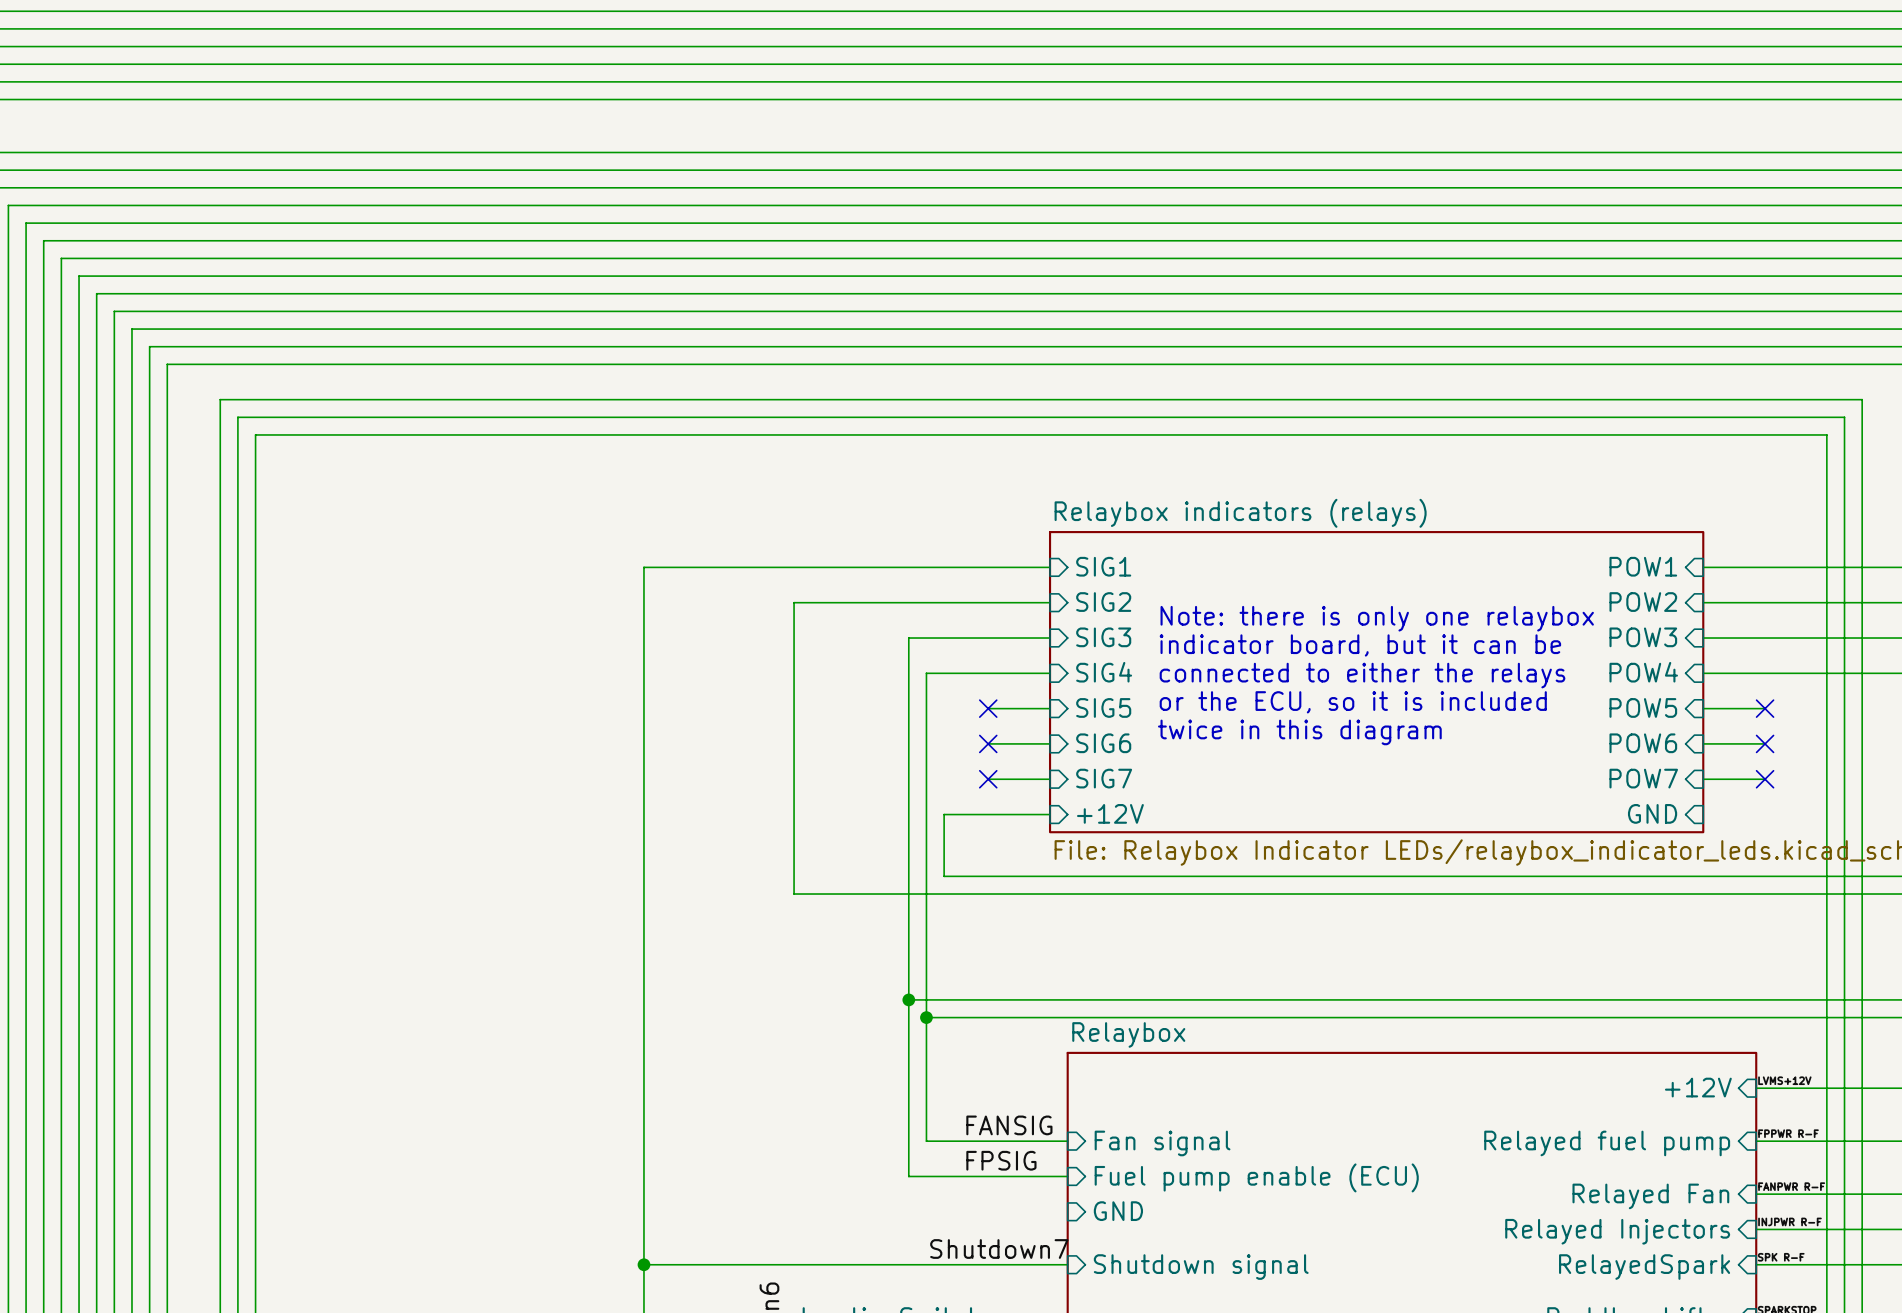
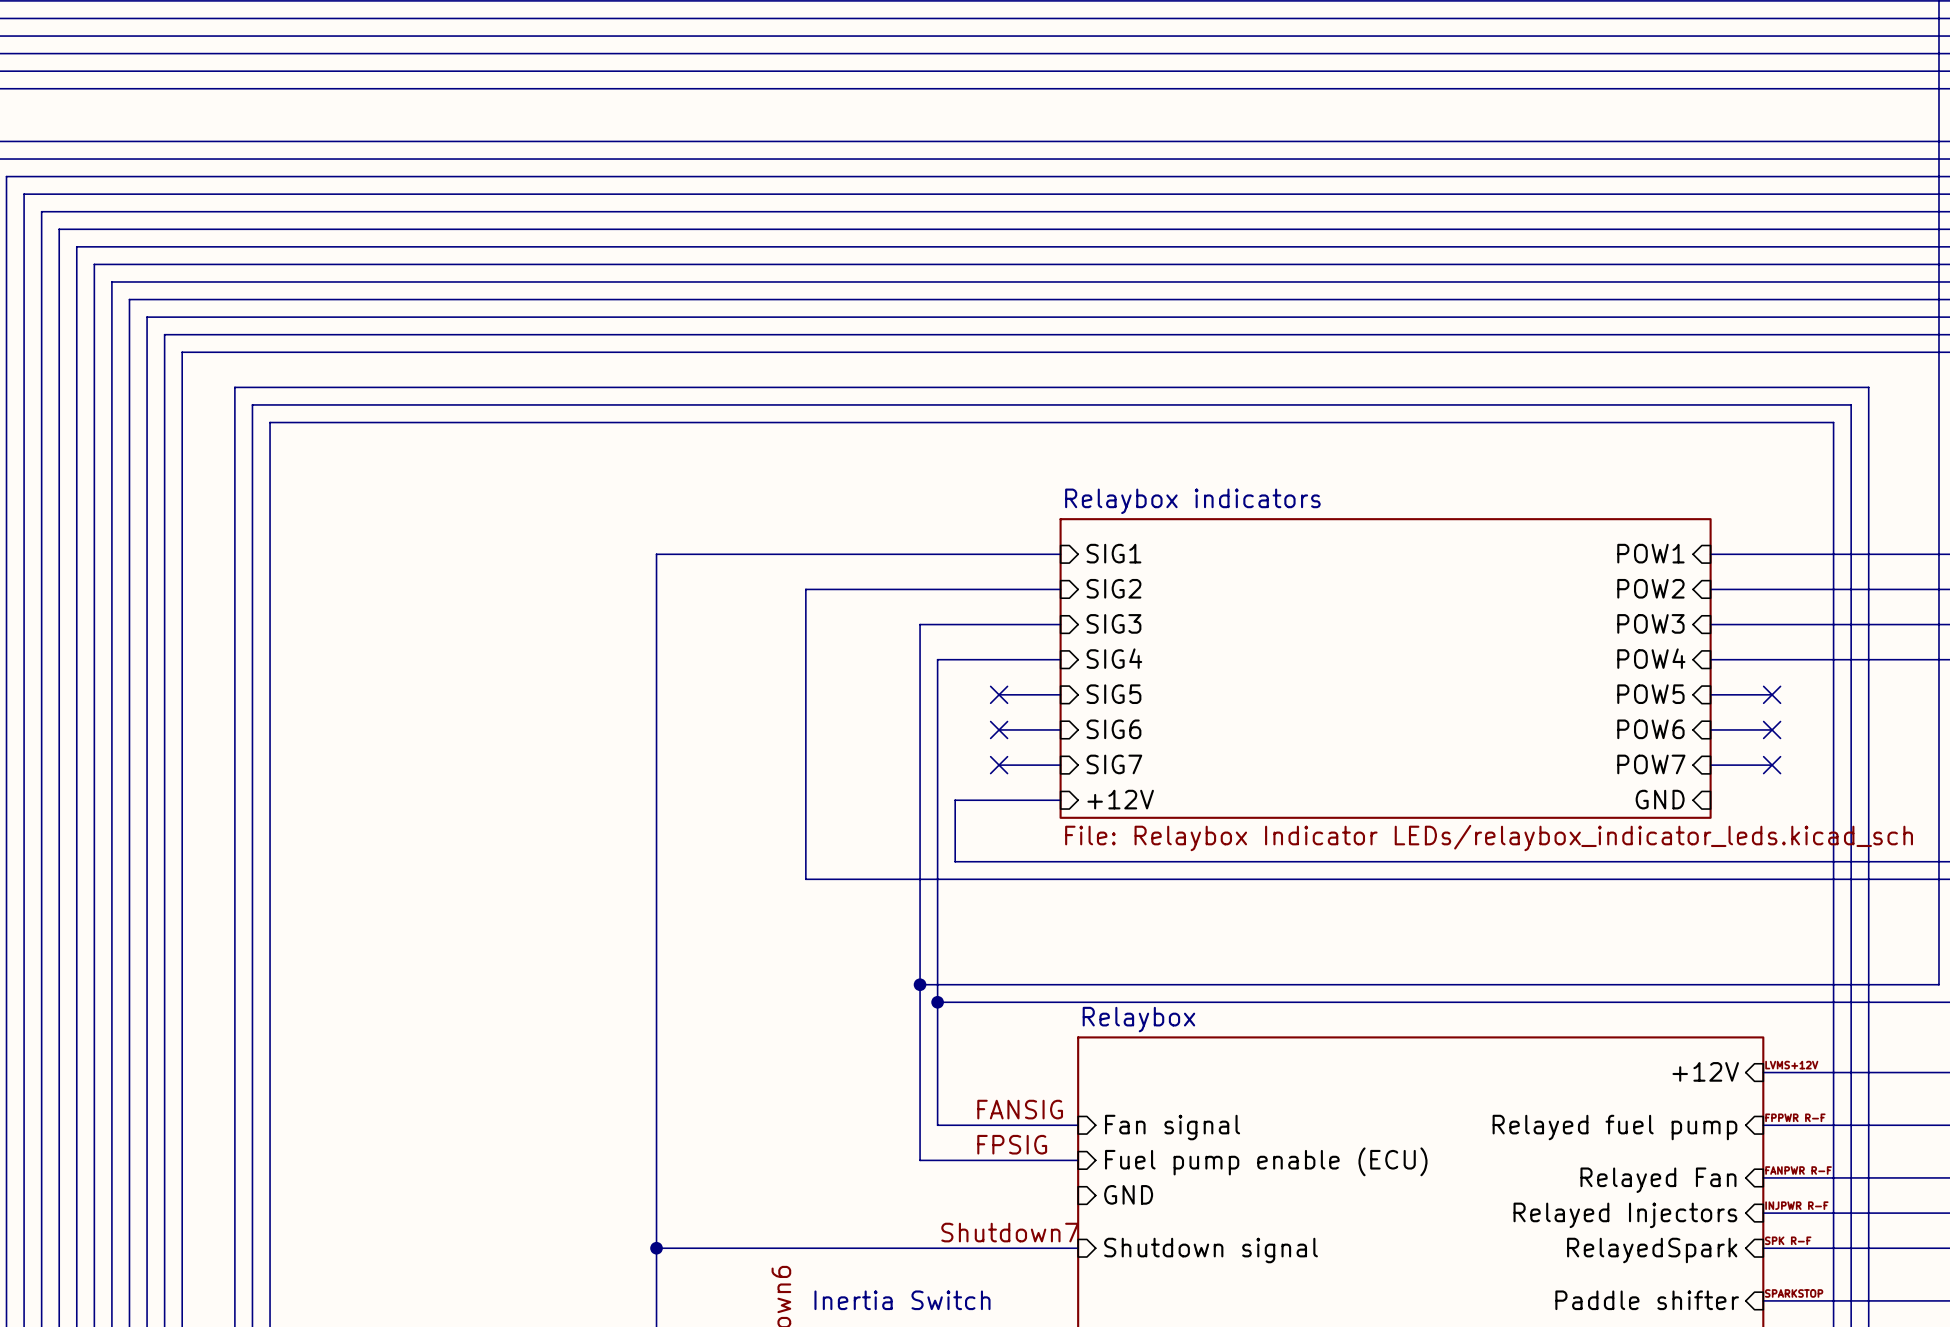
sheet Relaybox indicators (relays) name: Relaybox indicators (relays) (1240, 513) -> Relaybox indicators (1192, 501)
text: Note: there is only one relaybox (1377, 618) -> none
text: indicator board, but it can be (1360, 645) -> none
text: connected to either the relays (1362, 675) -> none
text: or the ECU, so it is included (1353, 702) -> none
text: twice in this diagram (1299, 732) -> none

